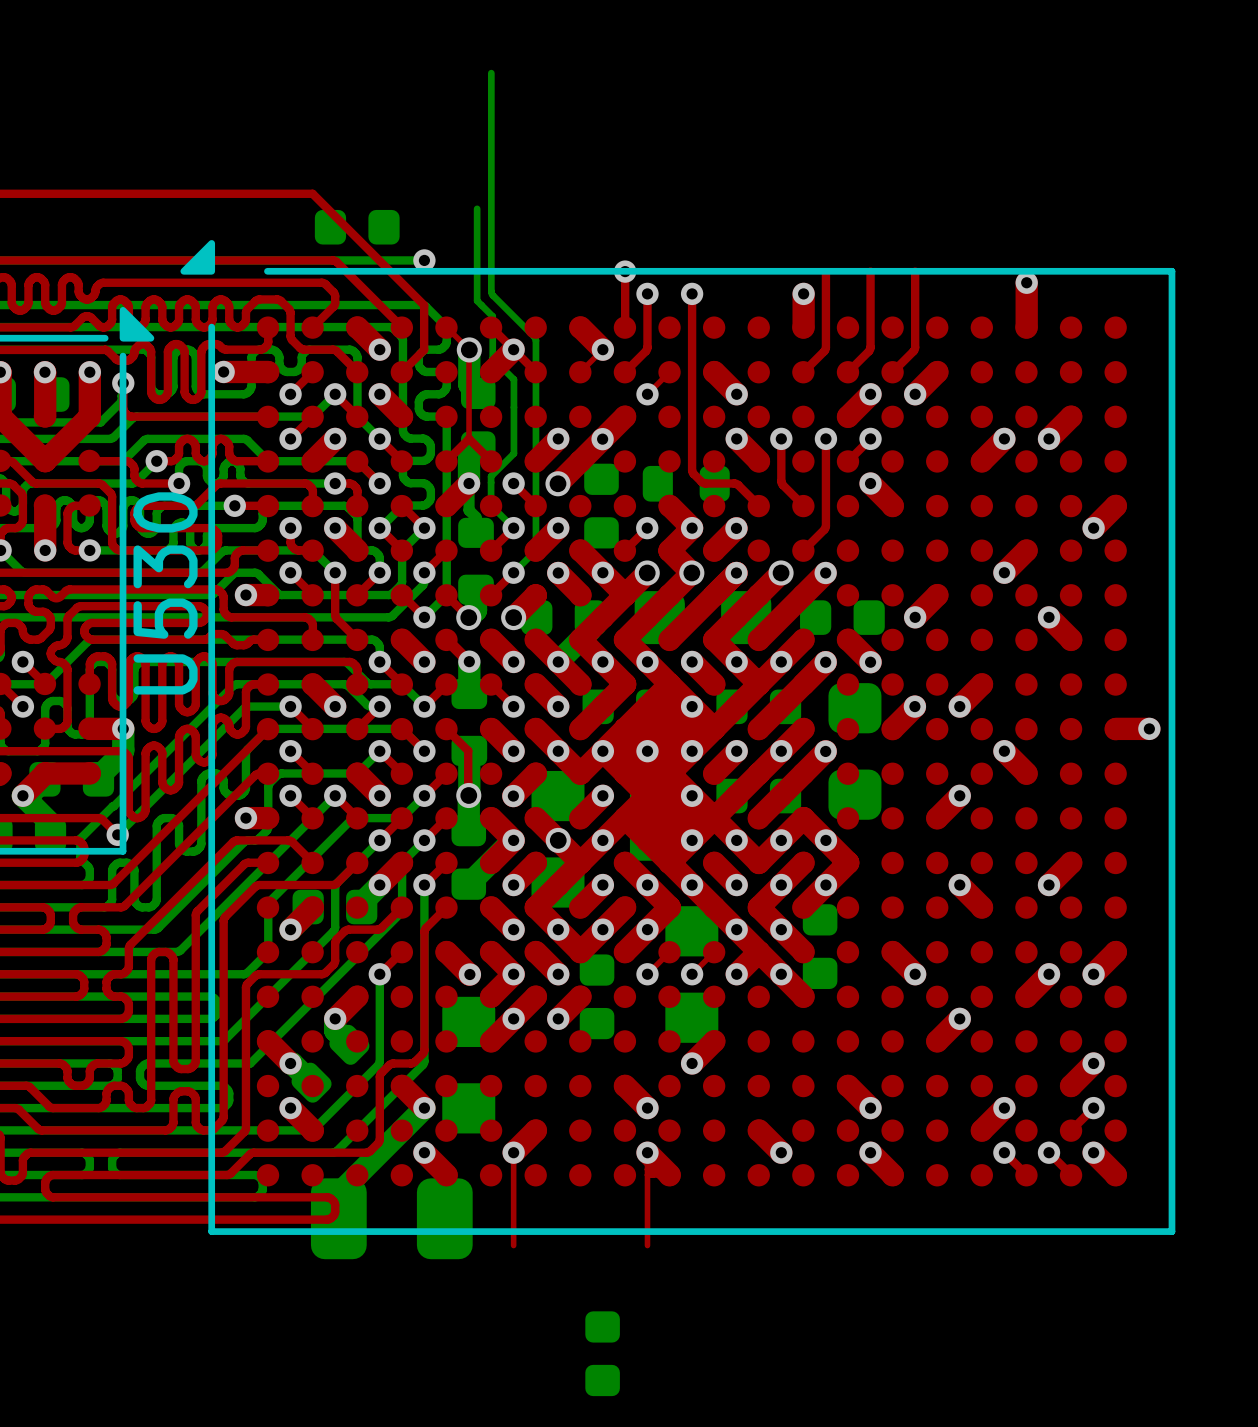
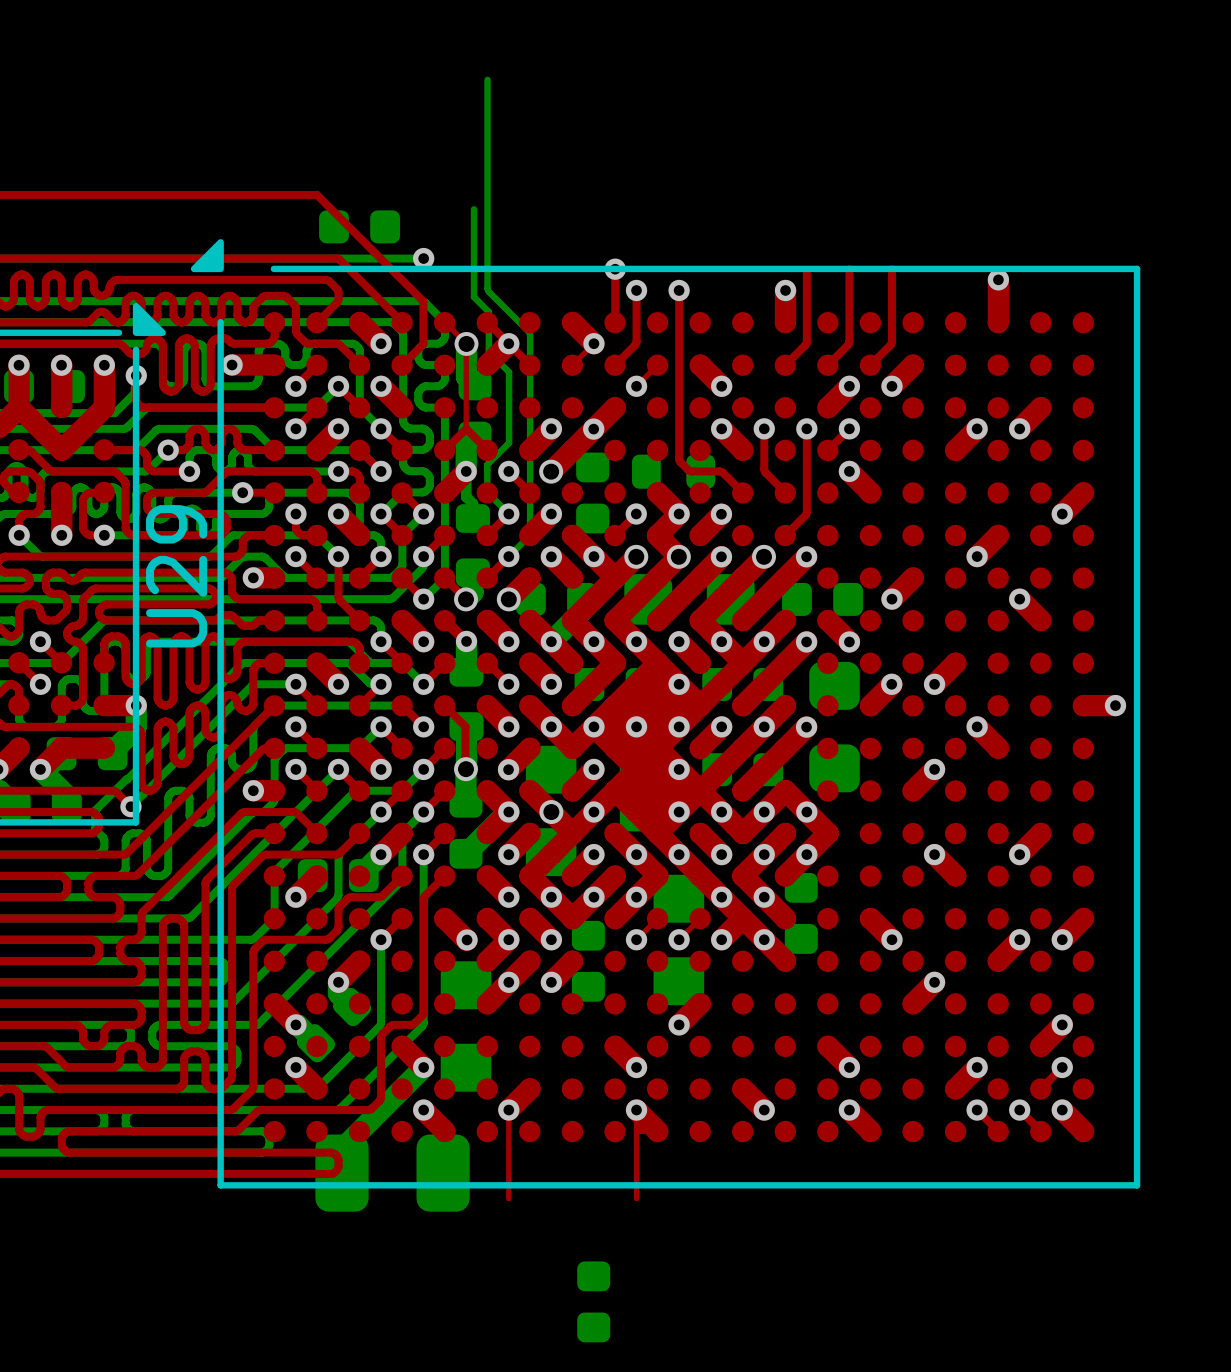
U530 name: U530 (165, 593) -> U29 (176, 576)

